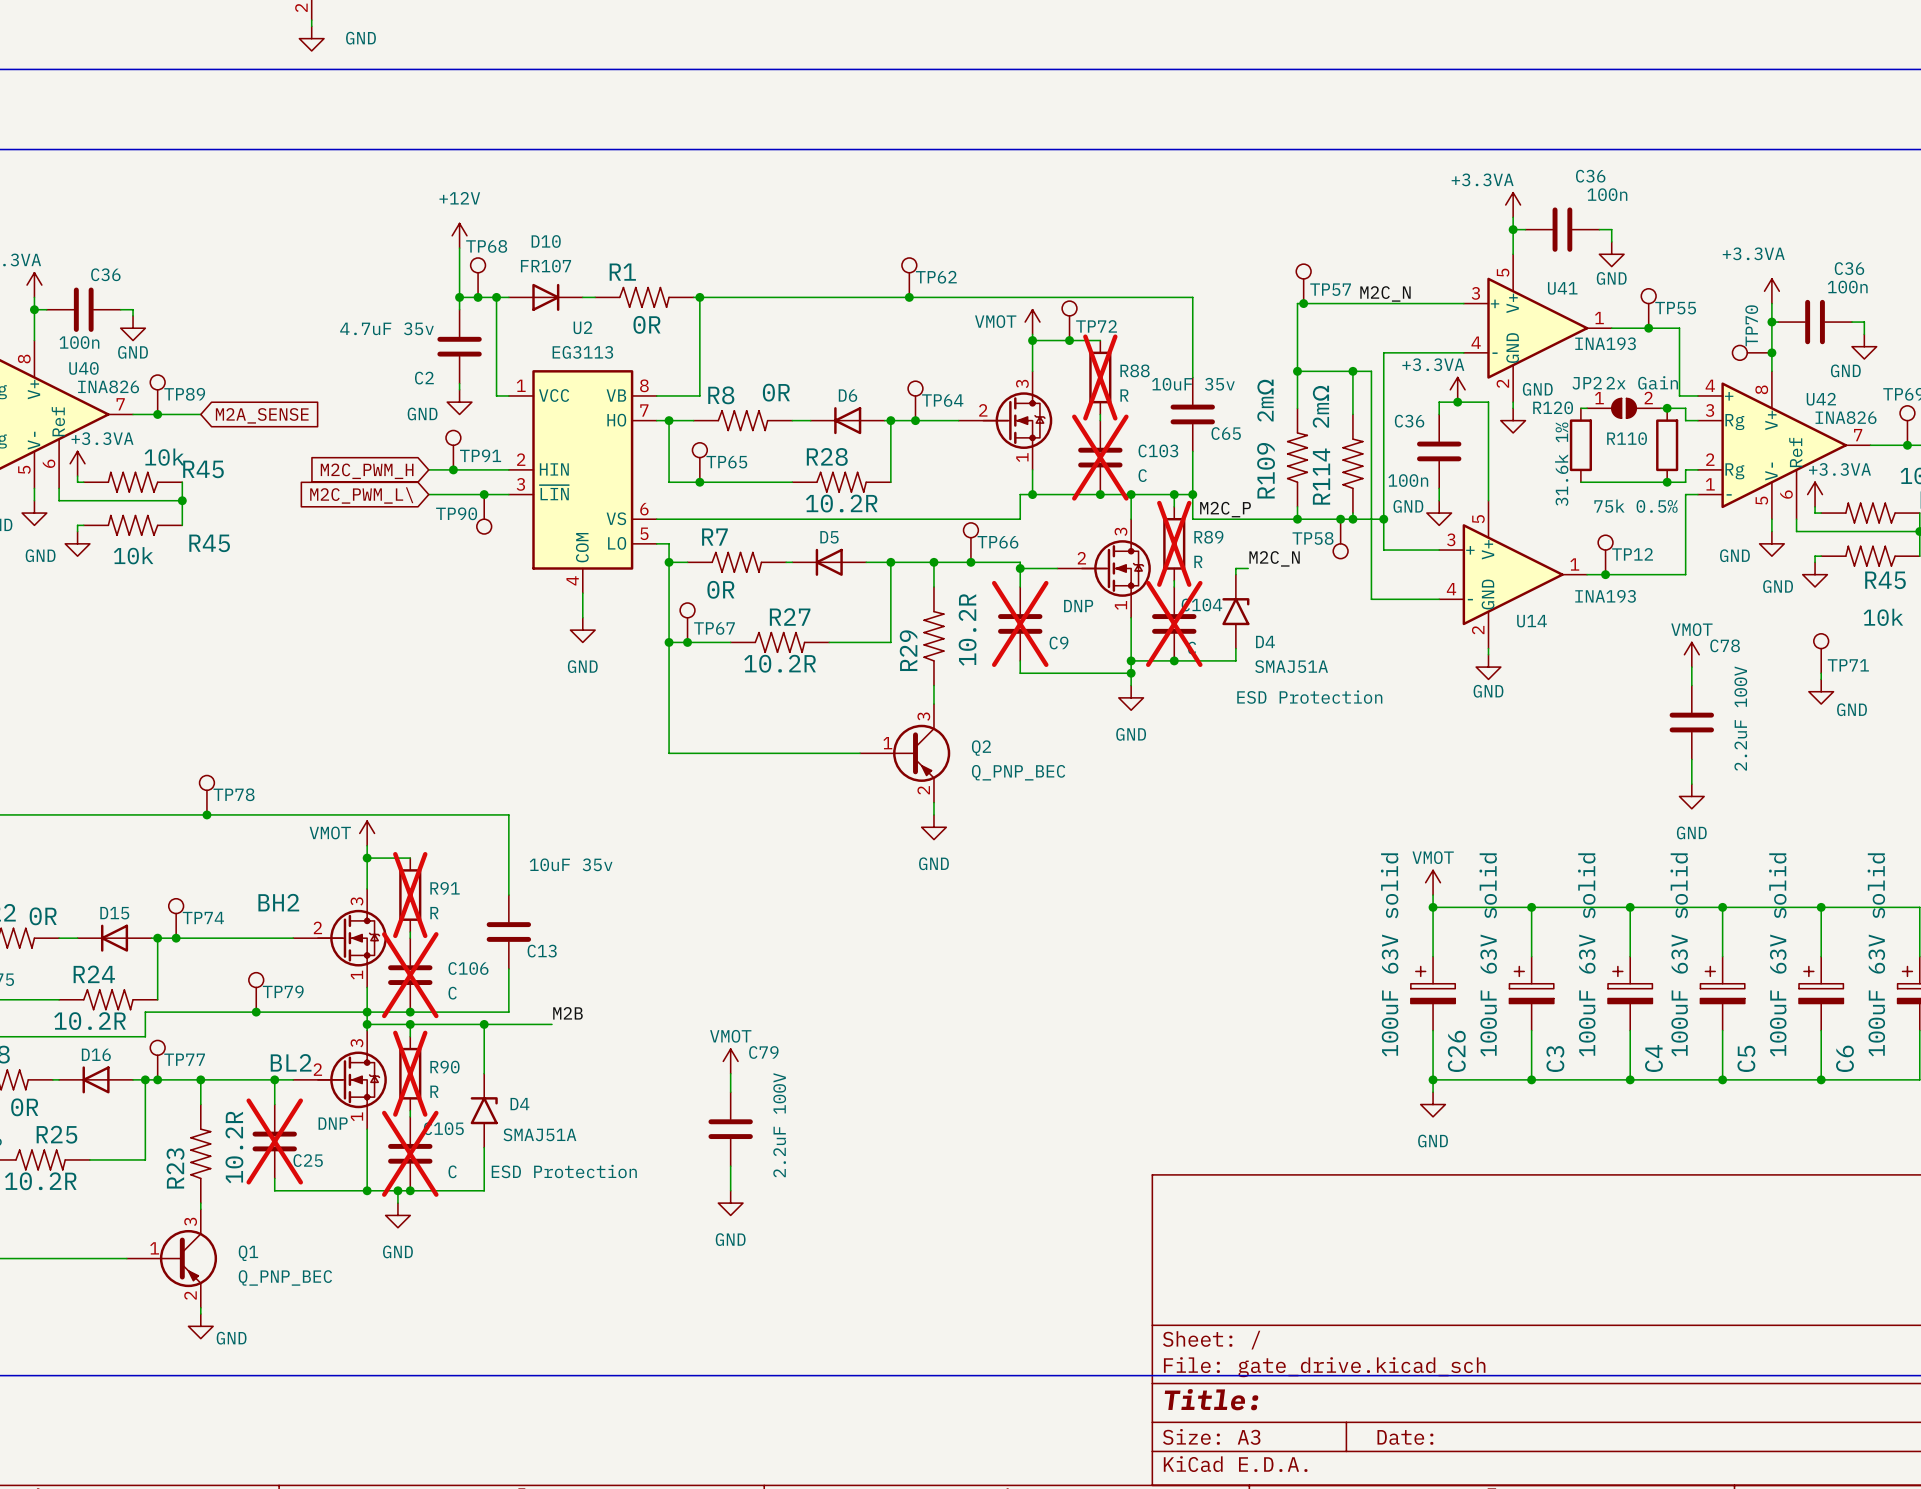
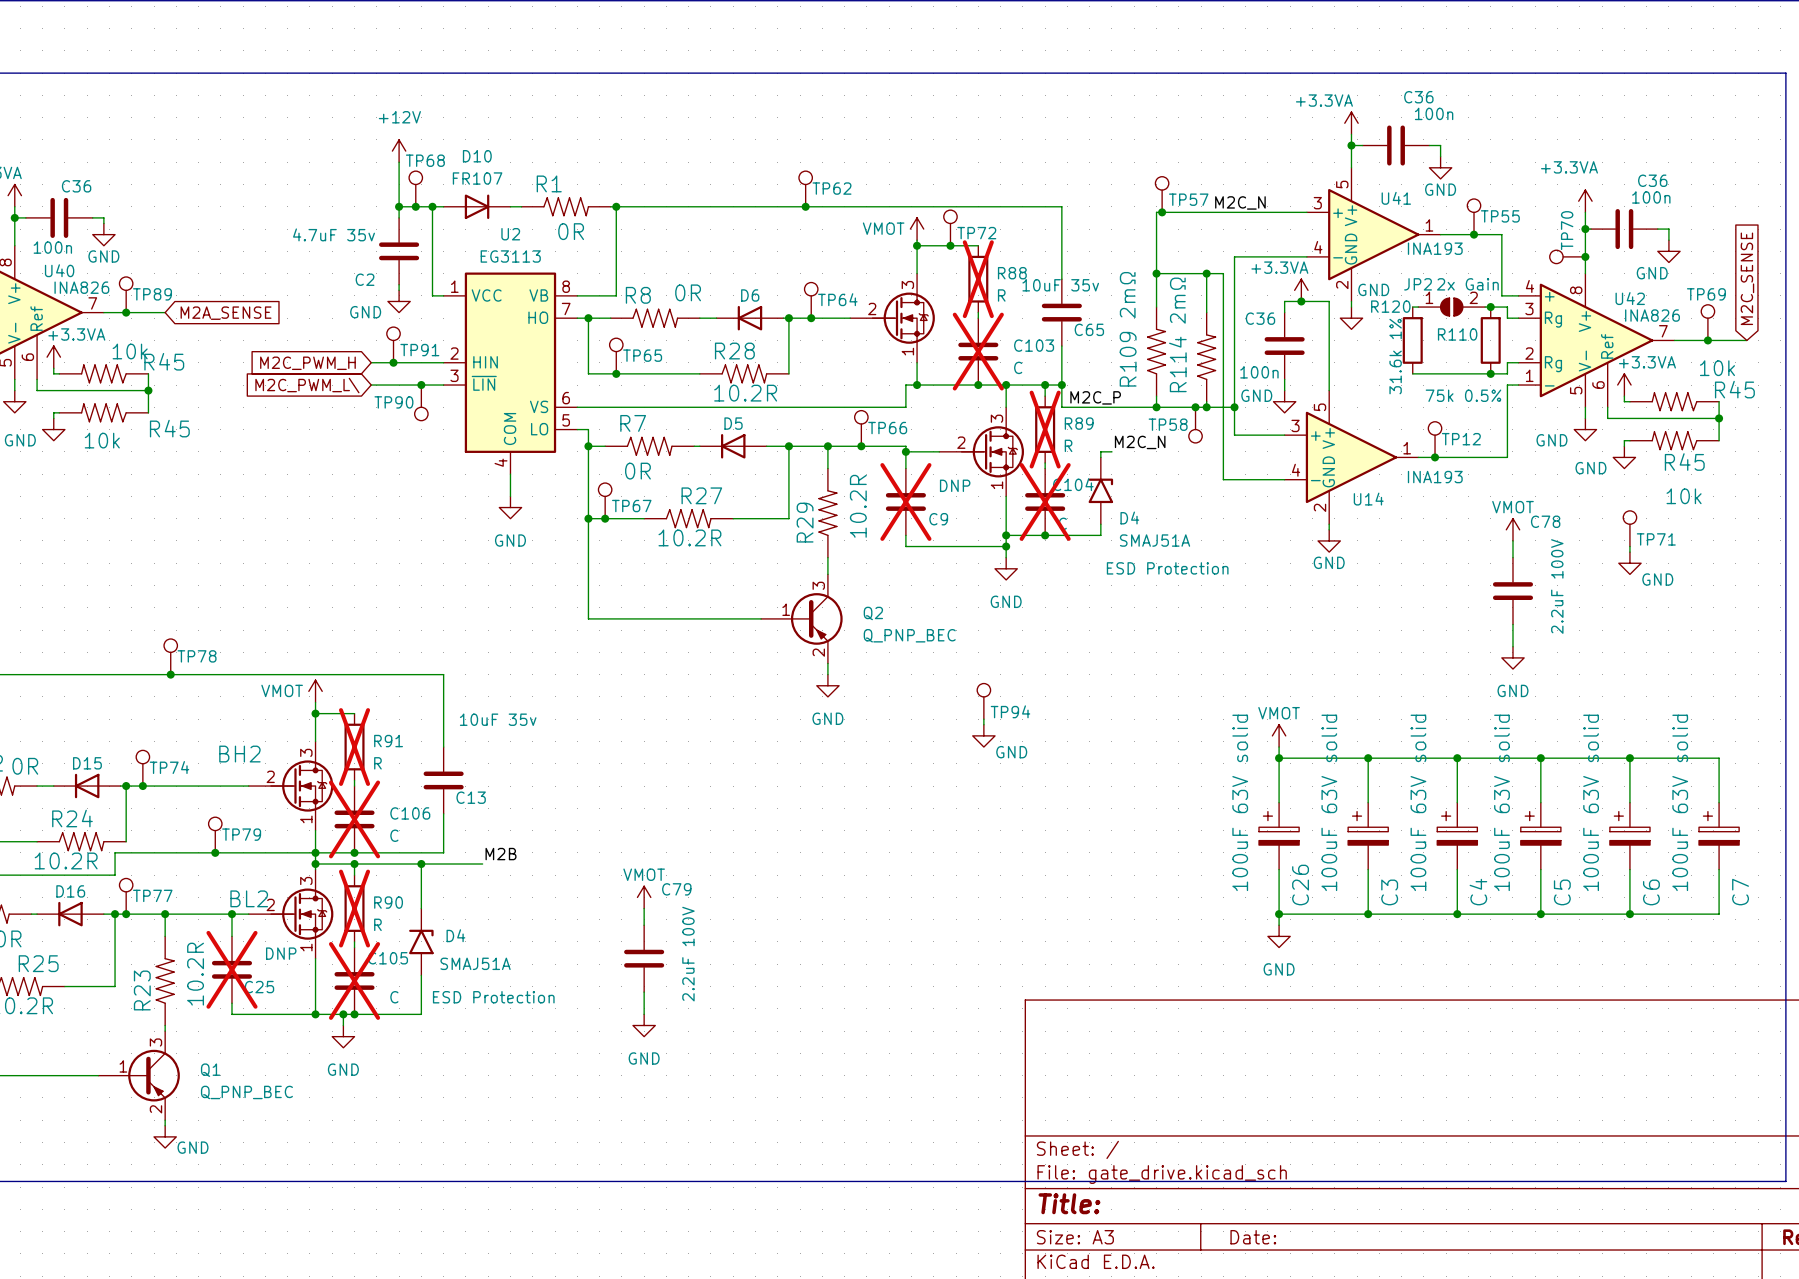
TP94: none -> (983, 701)
wire: none -> (983, 719) (983, 724)
power symbol: none -> GND (983, 735)

